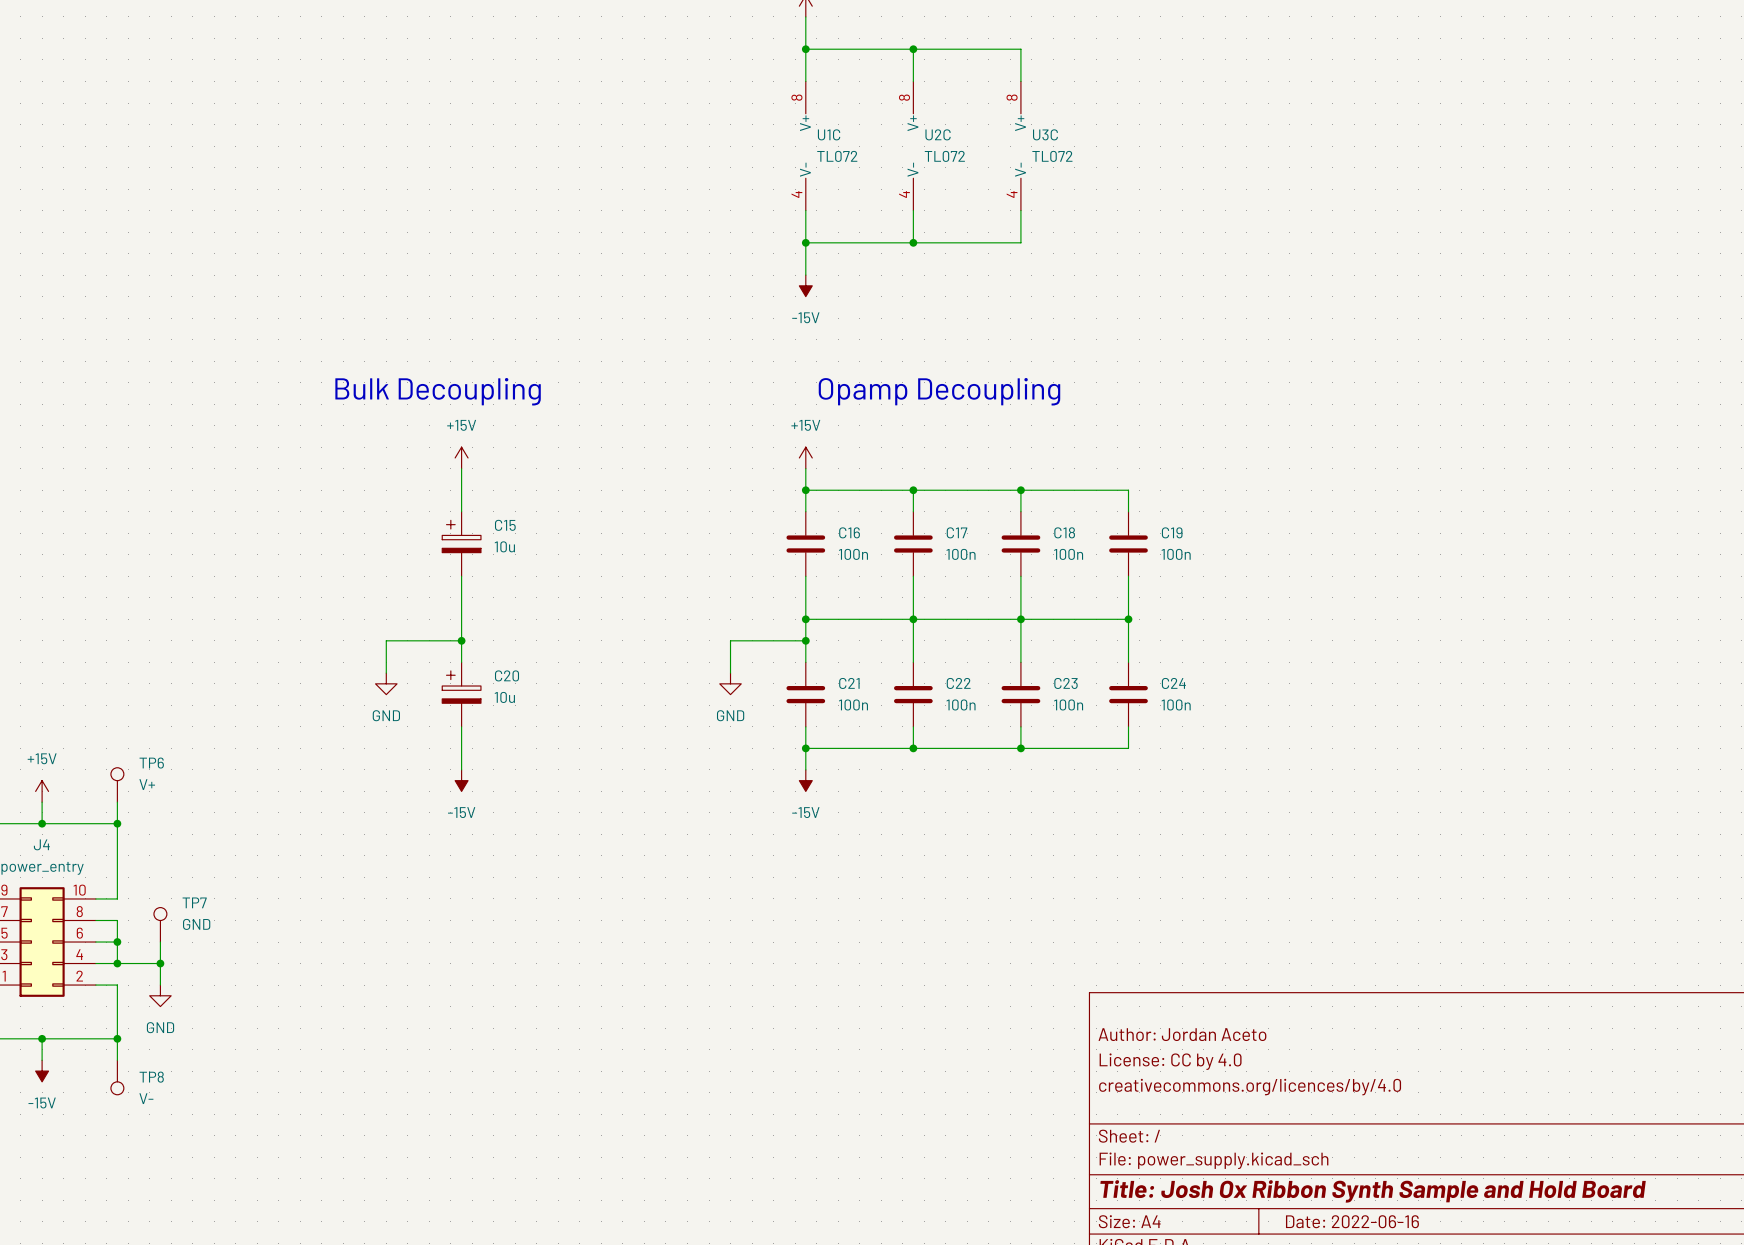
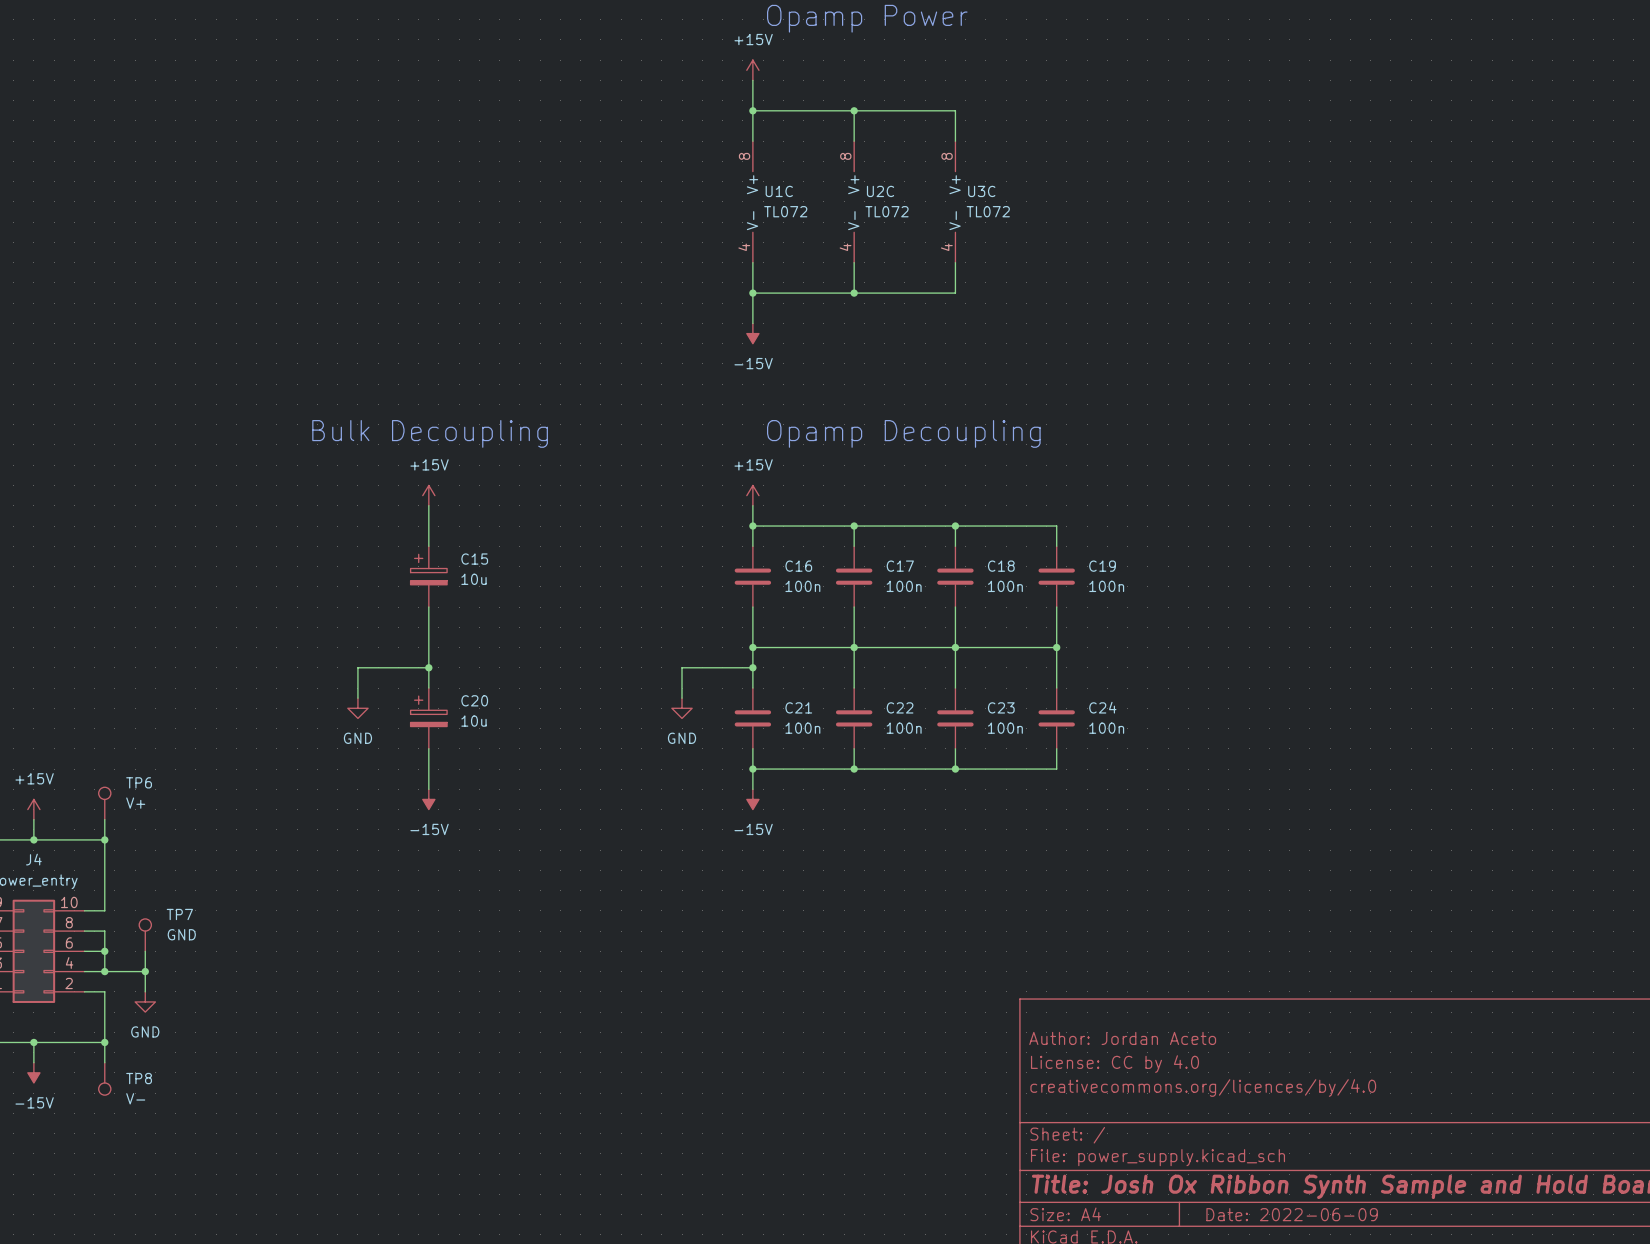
title block: Date: 2022-06-16 (1352, 1221) -> Date: 2022-06-09 (1292, 1214)

